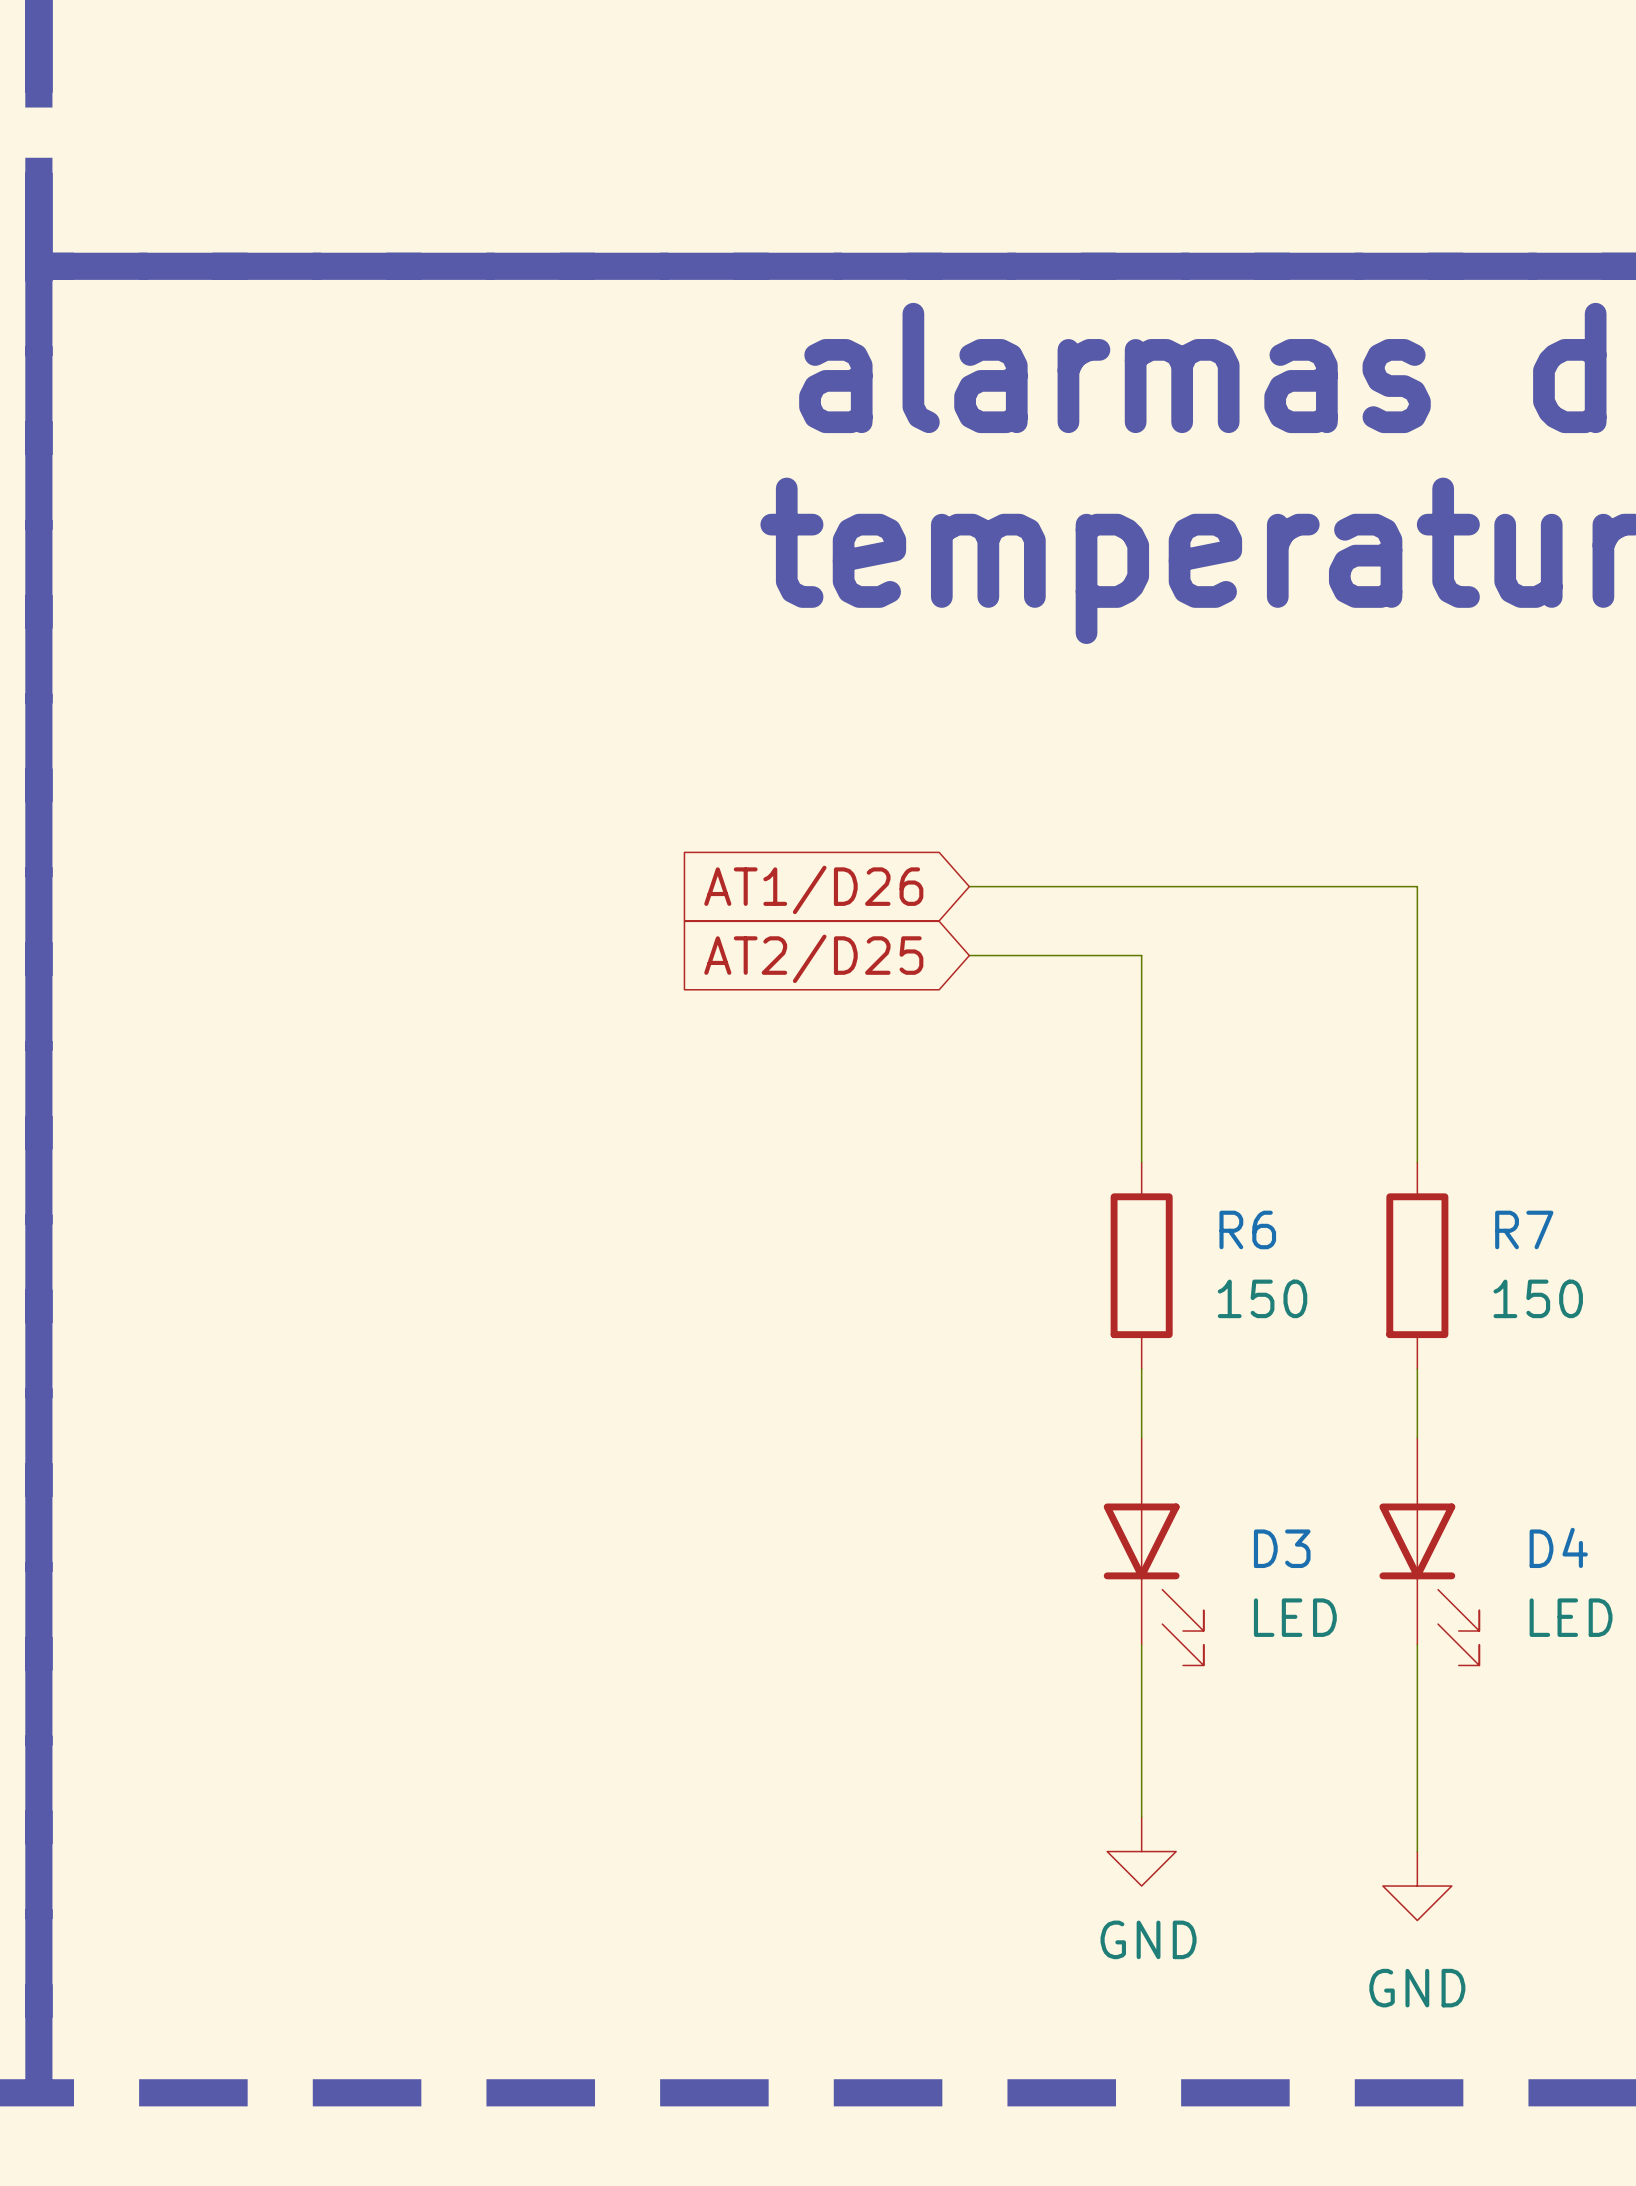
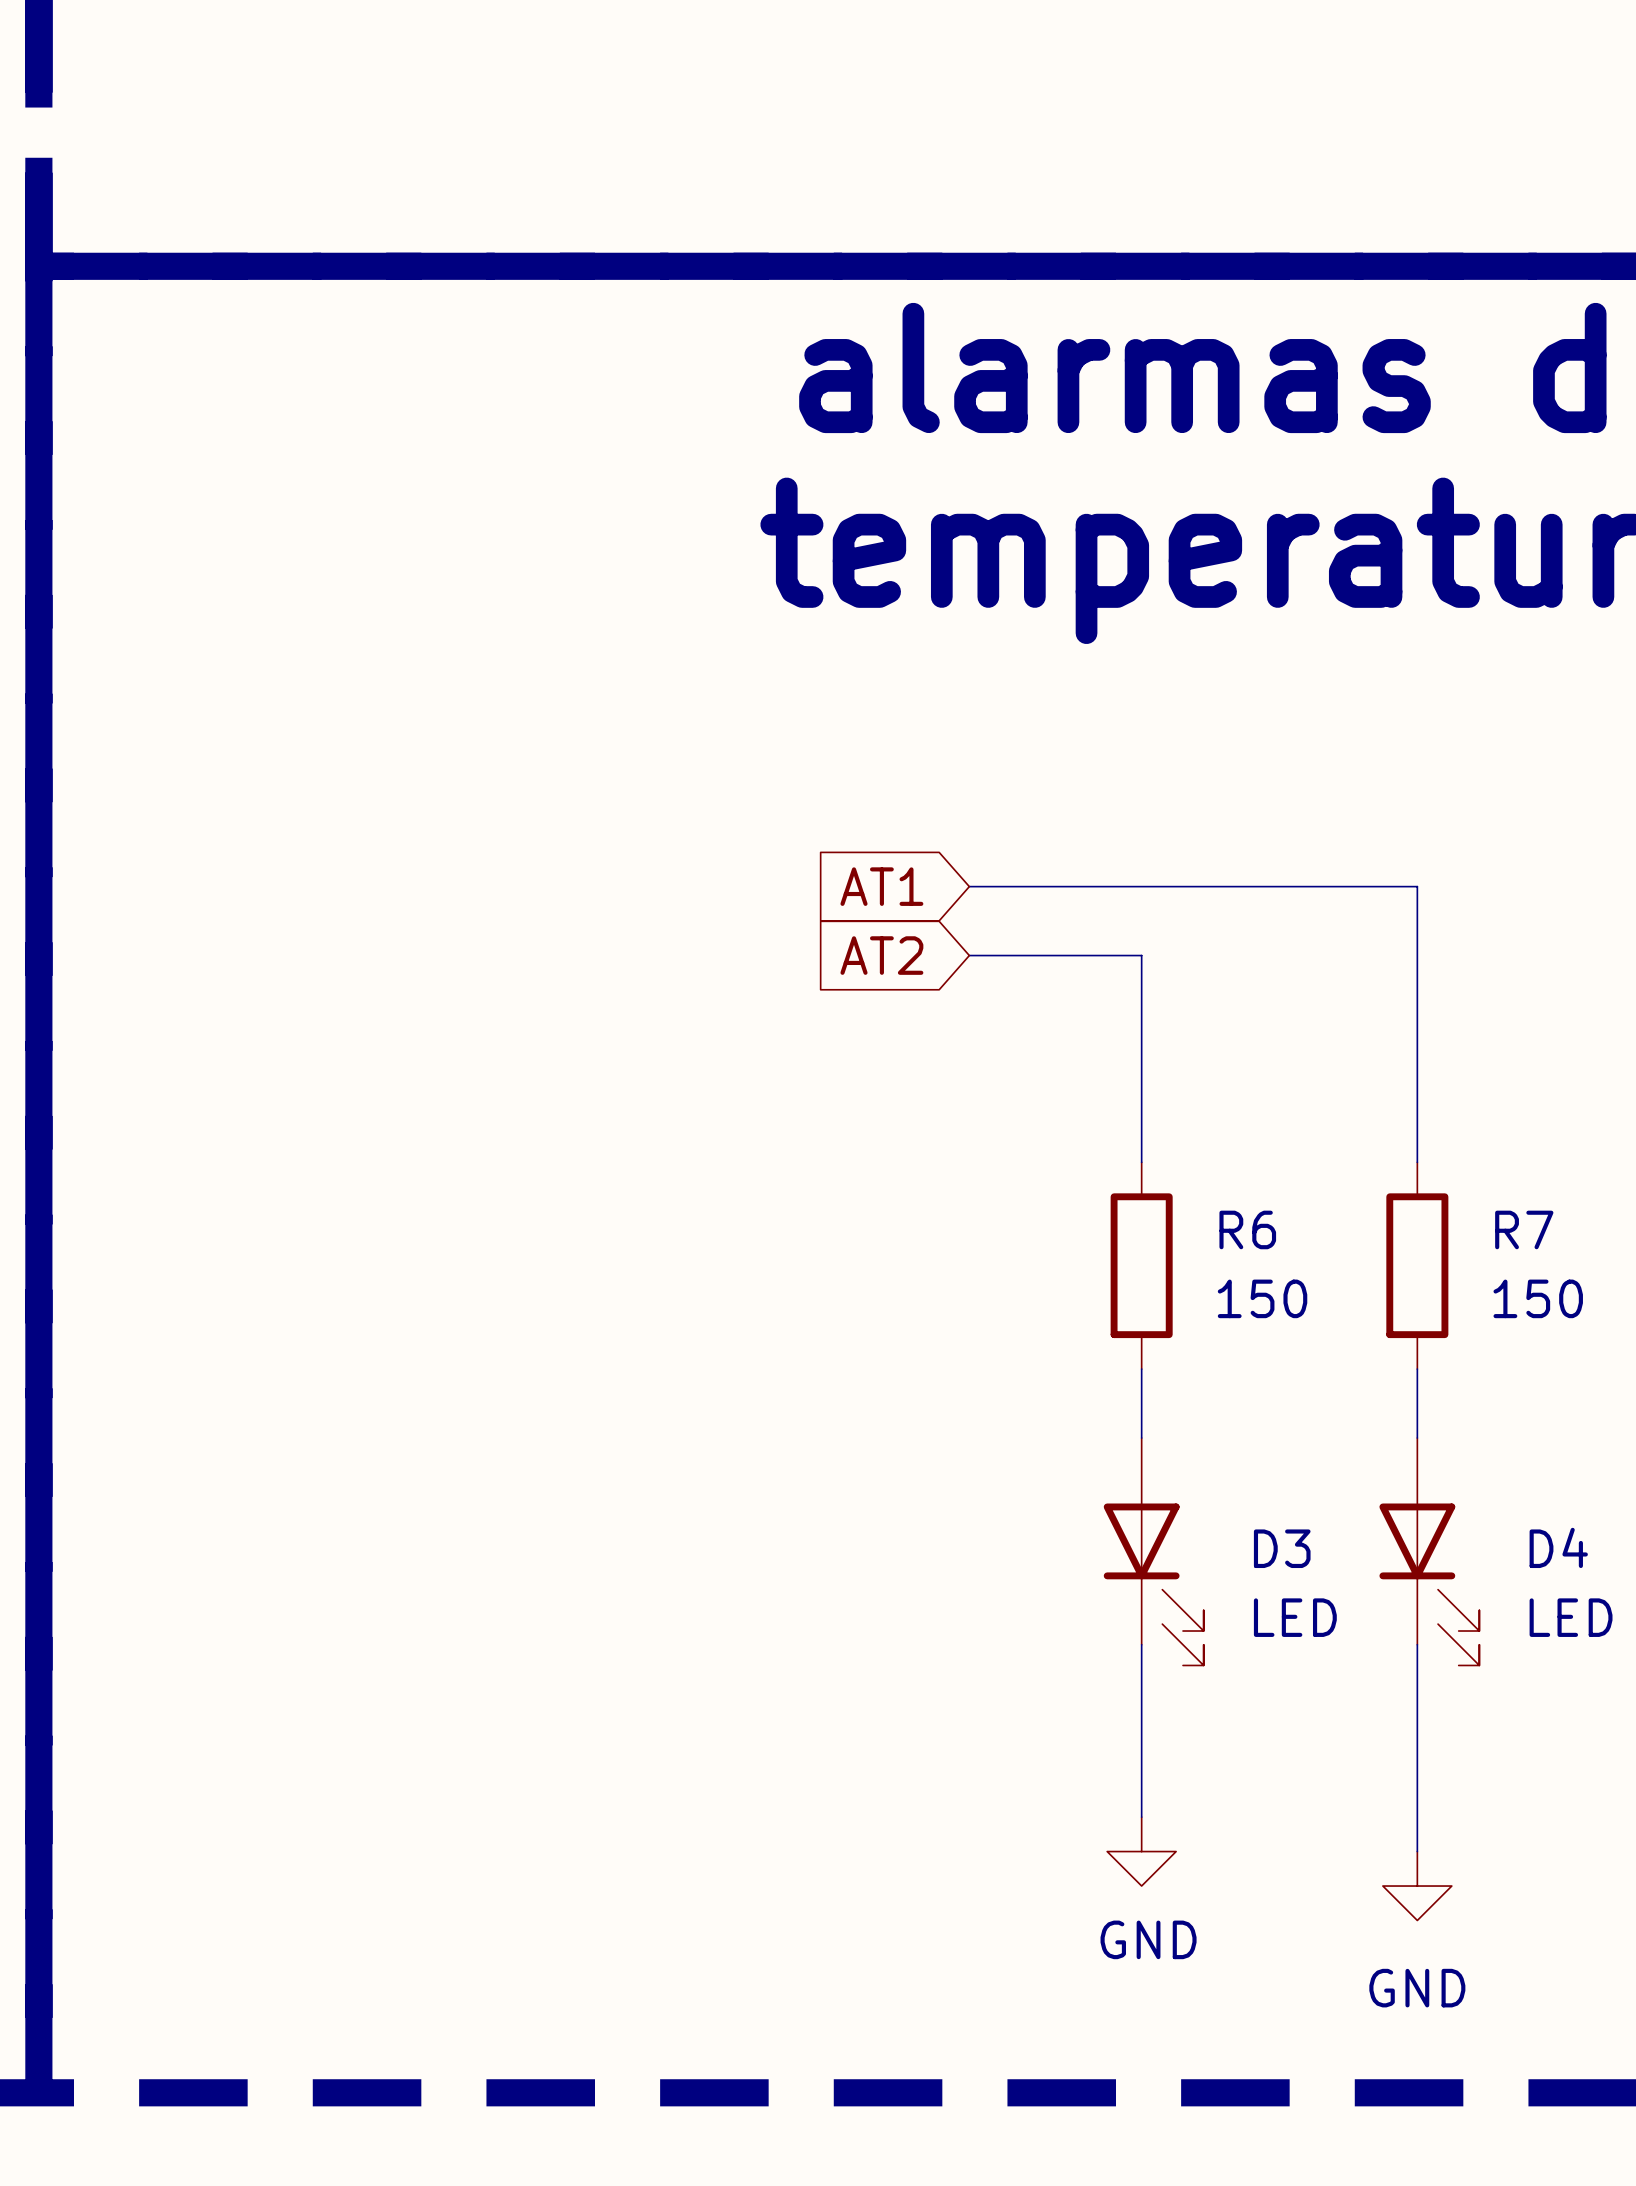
global label: AT1/D26 (813, 889) -> AT1 (881, 886)
global label: AT2/D25 (813, 958) -> AT2 (881, 955)

